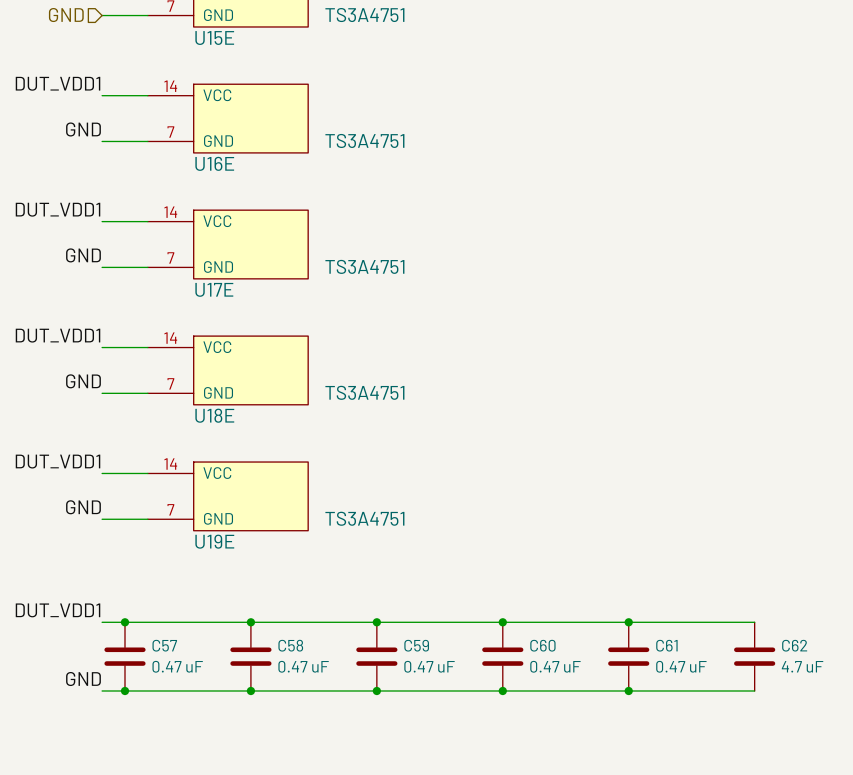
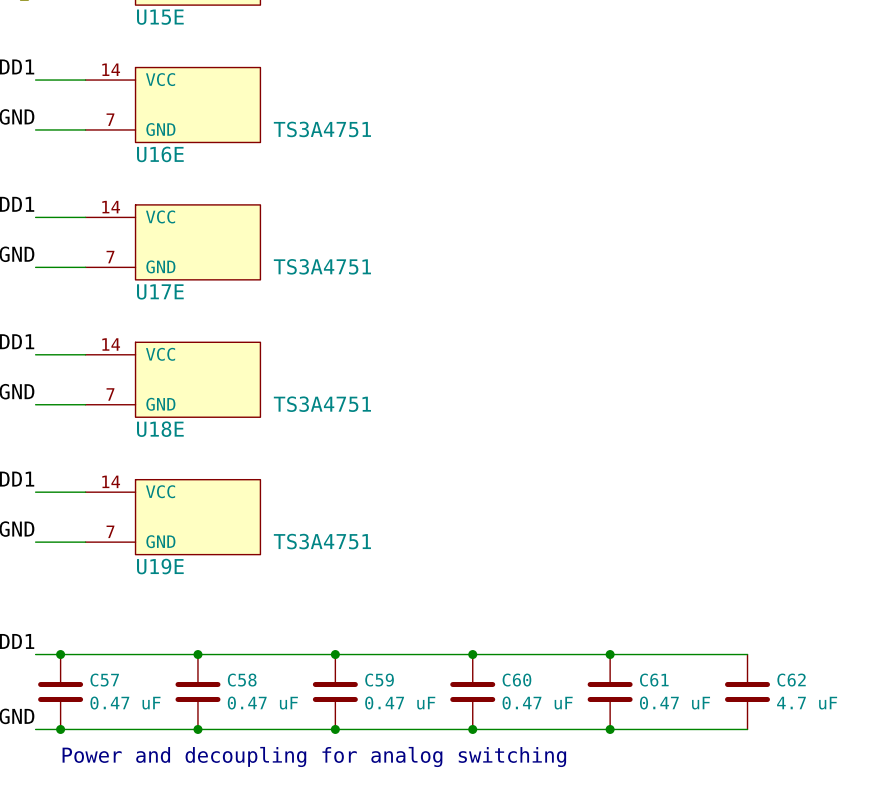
text: none -> Power and decoupling for analog switching (314, 756)

